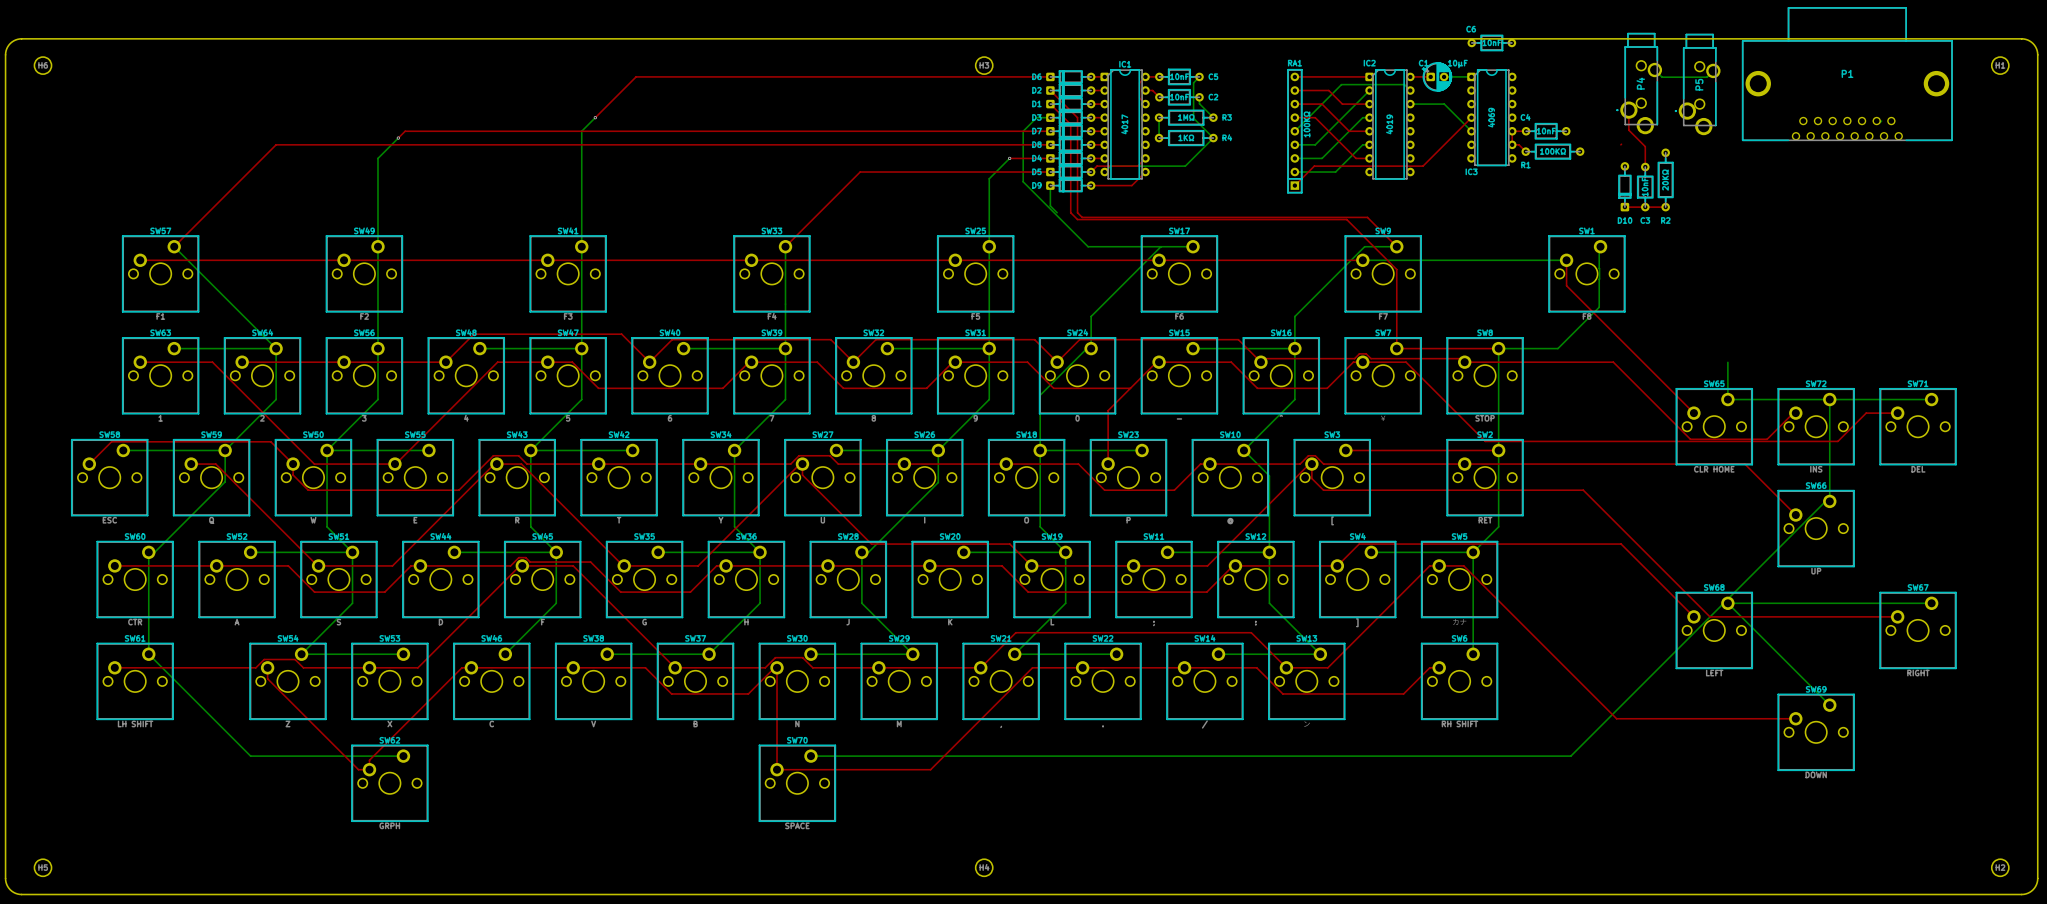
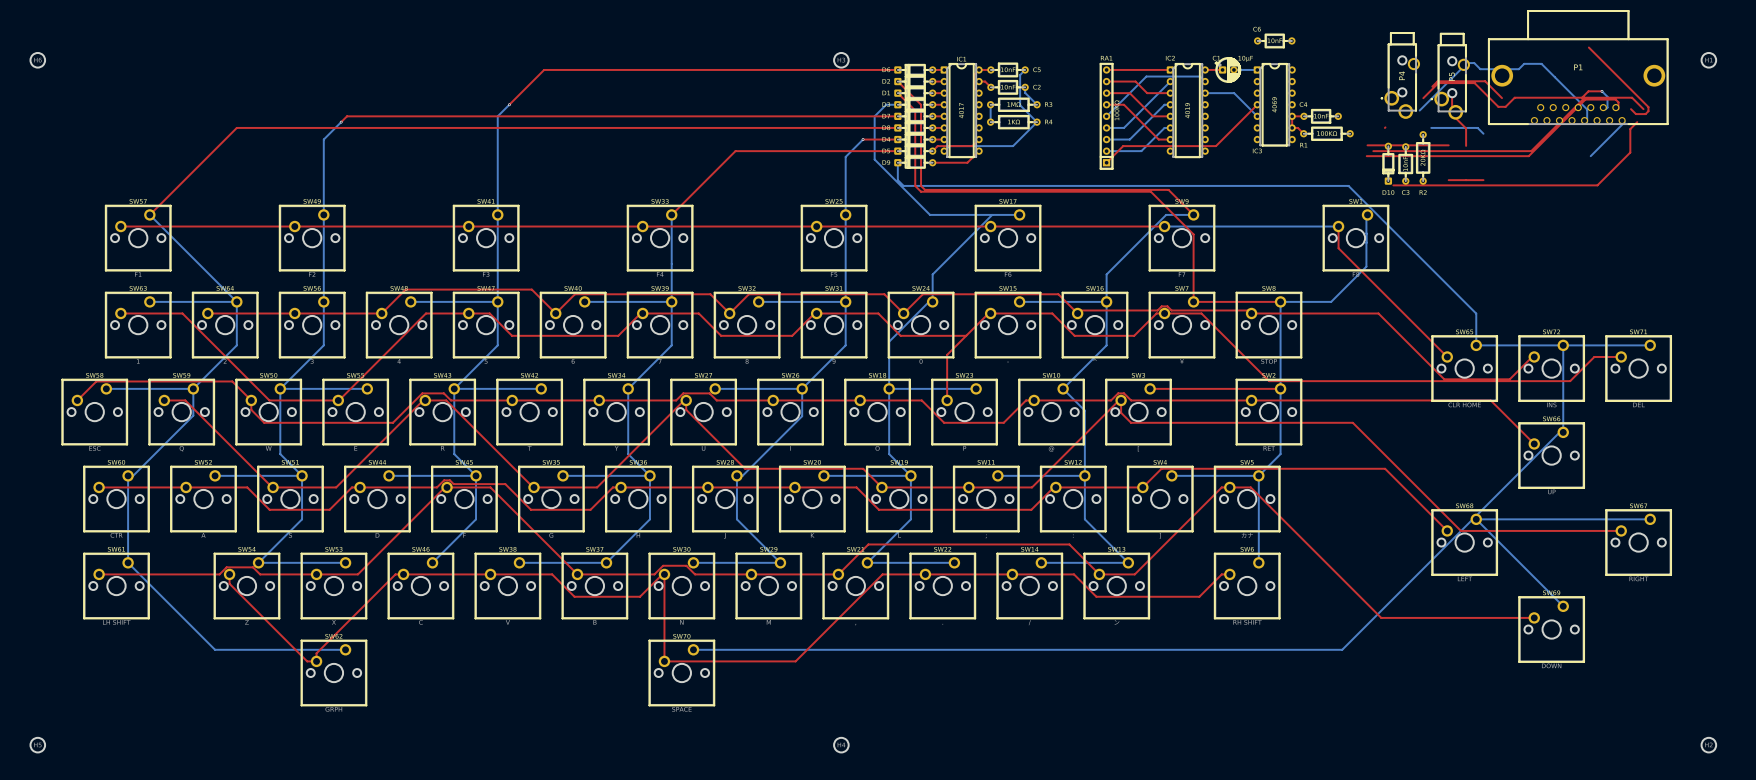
board edge: (21, 38) (2027, 40) (2035, 46) (2037, 54) (2036, 884) (2031, 891) (2021, 894) (15, 893) (8, 888) (5, 878) (5, 54) (10, 43) (21, 38) -> none
top track: none -> (1588, 47) (1648, 107) (1648, 111) (1645, 114) (1635, 114) (1631, 109)
bottom track: (1654, 70) (1662, 77) (1707, 77) (1713, 70) -> none
top track: none -> (1432, 86) (1437, 81) (1485, 81) (1502, 98)
top track: none -> (1602, 91) (1588, 91) (1582, 97) (1514, 97) (1505, 106) (1498, 106) (1474, 83) (1438, 83) (1423, 98)
bottom track: none -> (1602, 91) (1607, 96) (1607, 107)
via: none -> (1602, 91)
top track: (1628, 110) (1628, 130) (1645, 146) (1645, 167) -> (1452, 97) (1452, 114) (1466, 128) (1466, 145)
top track: none -> (1618, 109) (1618, 102) (1615, 99) (1585, 99) (1528, 156) (1366, 156)
top track: none -> (1643, 109) (1632, 97) (1584, 97) (1531, 151) (1373, 151)
bottom track: none -> (1419, 110) (1467, 63) (1474, 63) (1480, 69) (1518, 69) (1524, 63) (1541, 63) (1587, 109) (1587, 122)
bottom track: none -> (1624, 122) (1590, 156)
top track: none -> (1637, 122) (1630, 129) (1630, 152) (1597, 185) (1393, 185)
bottom track: none -> (1431, 127) (1477, 127) (1483, 133)
top track: none -> (1367, 145) (1448, 145)
top track: (1624, 207) (1665, 207) -> (1448, 180) (1483, 180)
bottom track: none -> (903, 185) (1348, 185) (1476, 313)

